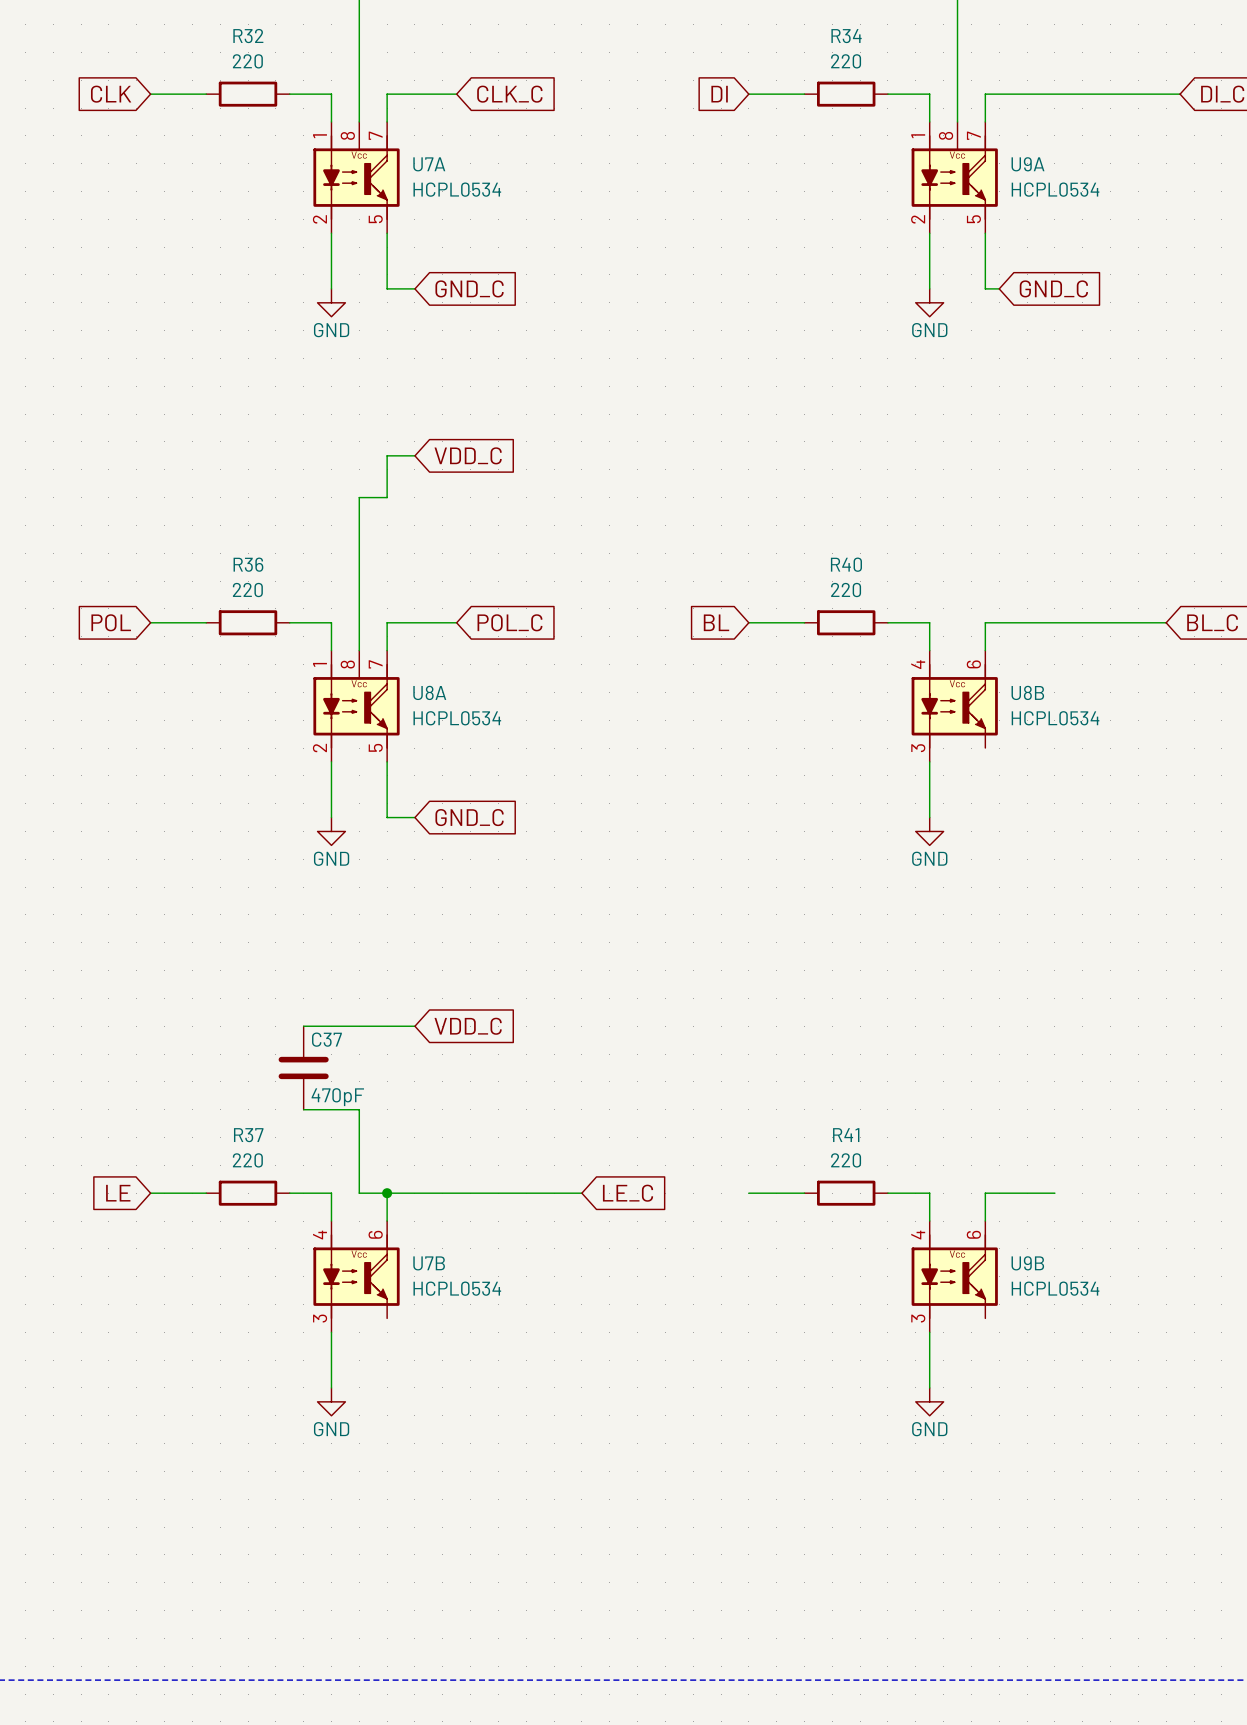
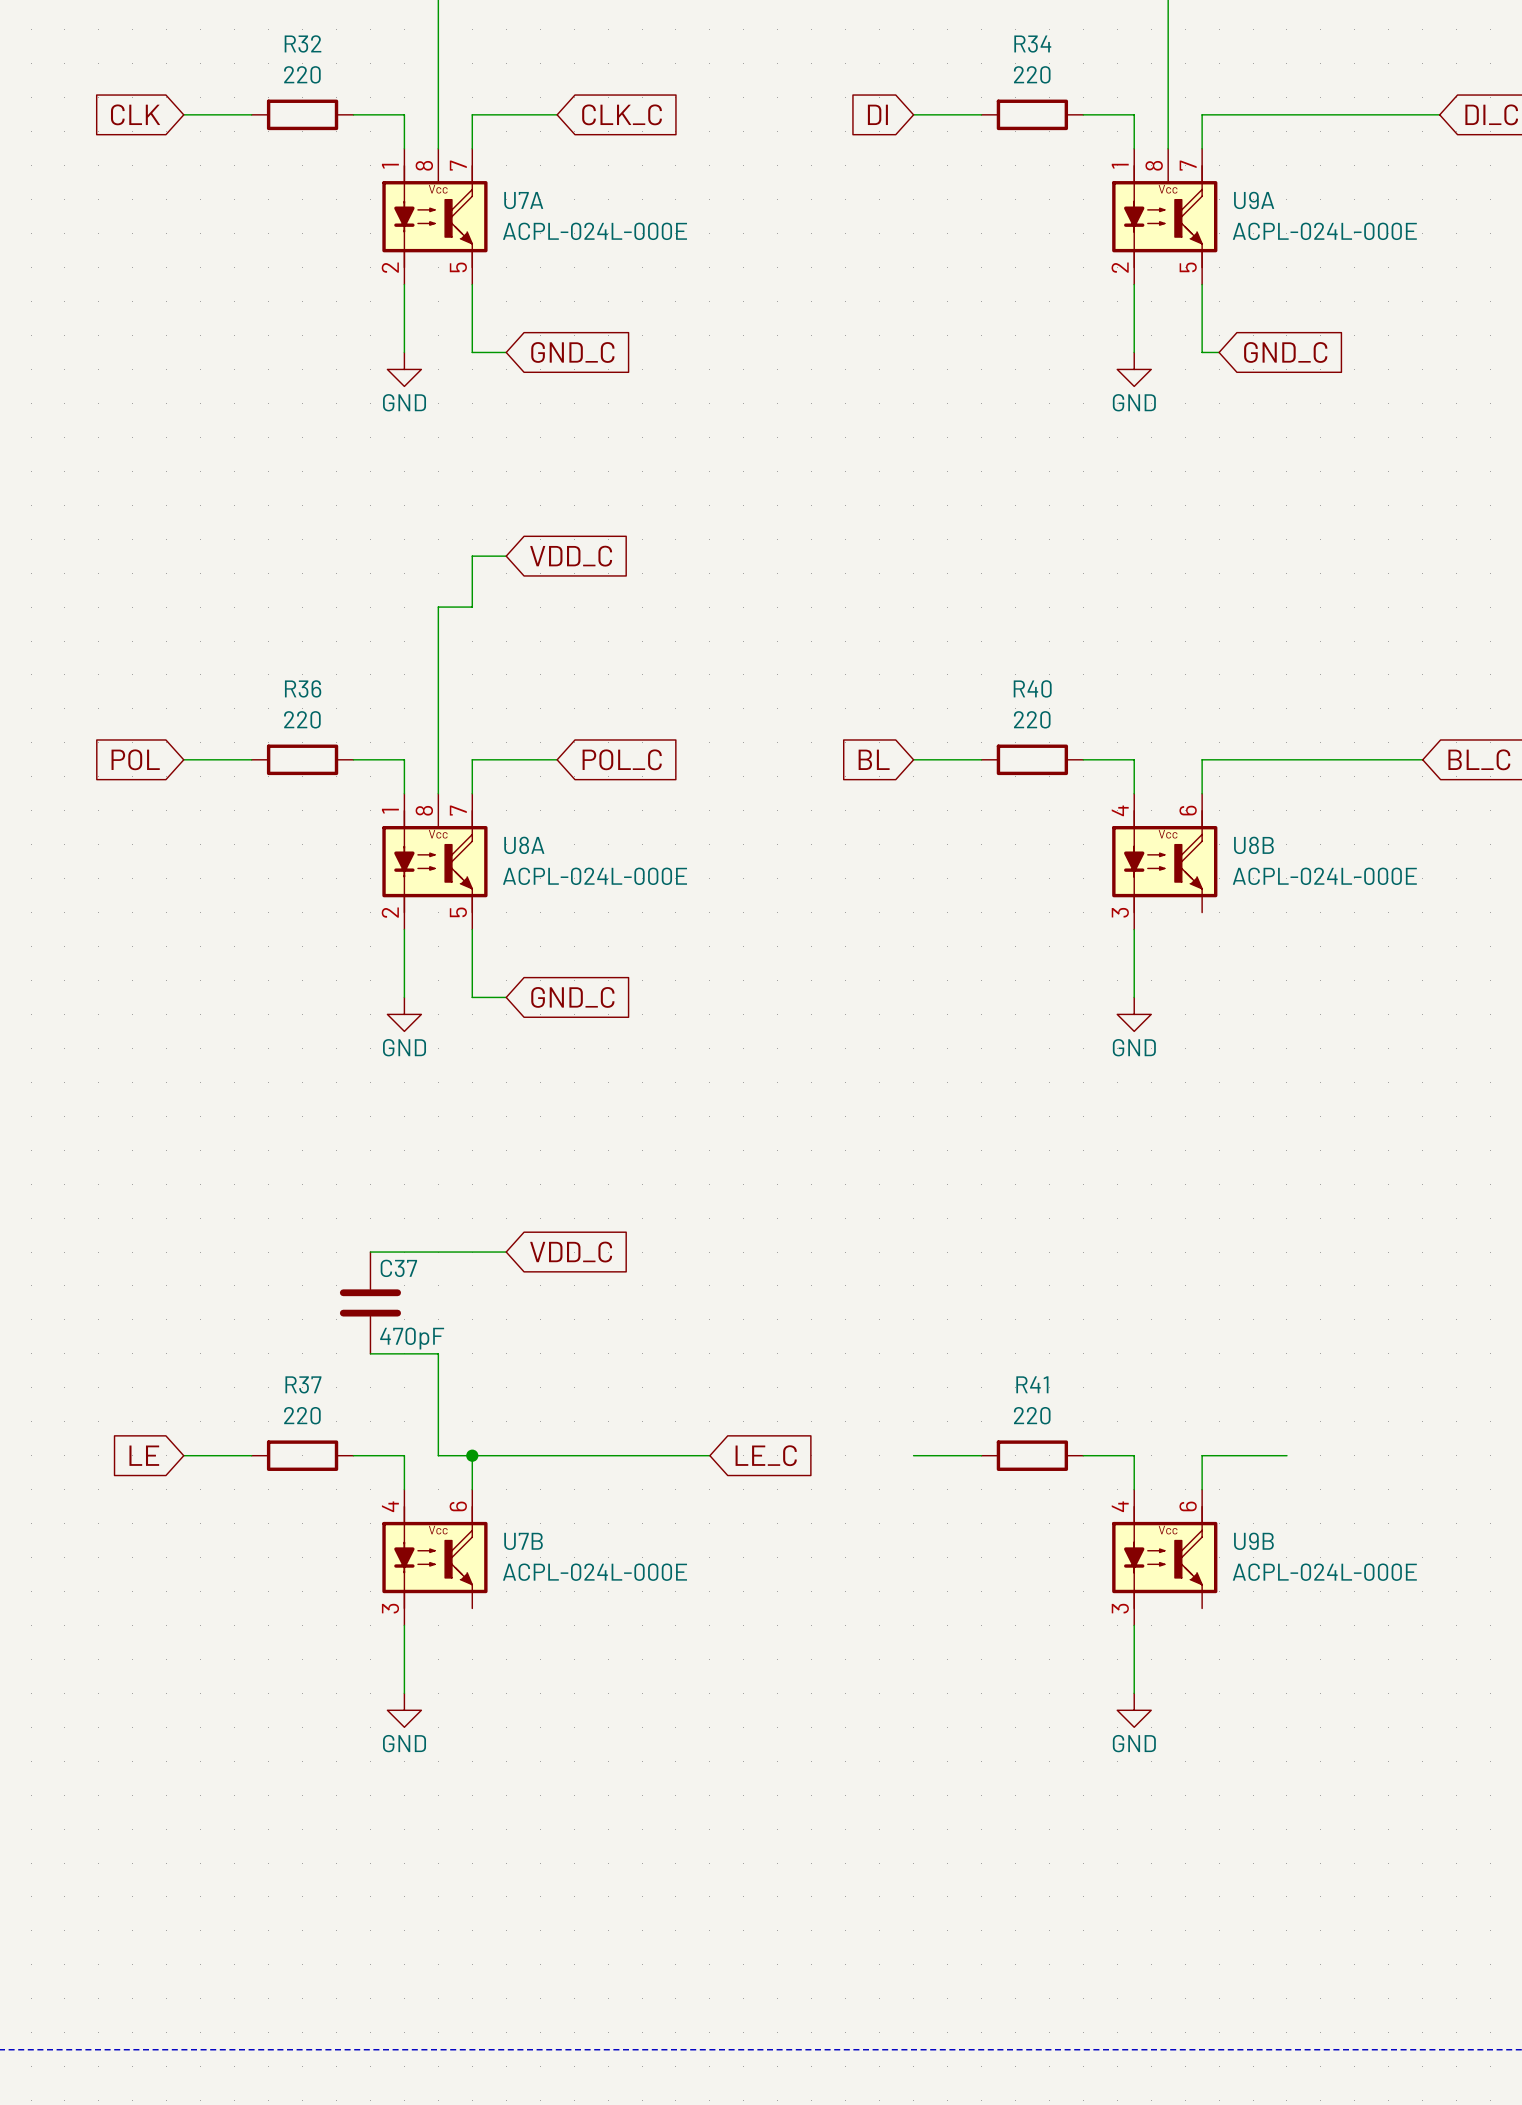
U7A value: HCPL0534 (457, 189) -> ACPL-024L-000E (594, 231)
U9A value: HCPL0534 (1055, 189) -> ACPL-024L-000E (1324, 231)
U8A value: HCPL0534 (457, 718) -> ACPL-024L-000E (594, 876)
U8B value: HCPL0534 (1055, 718) -> ACPL-024L-000E (1324, 876)
U7B value: HCPL0534 (457, 1288) -> ACPL-024L-000E (594, 1572)
U9B value: HCPL0534 (1055, 1288) -> ACPL-024L-000E (1324, 1572)

